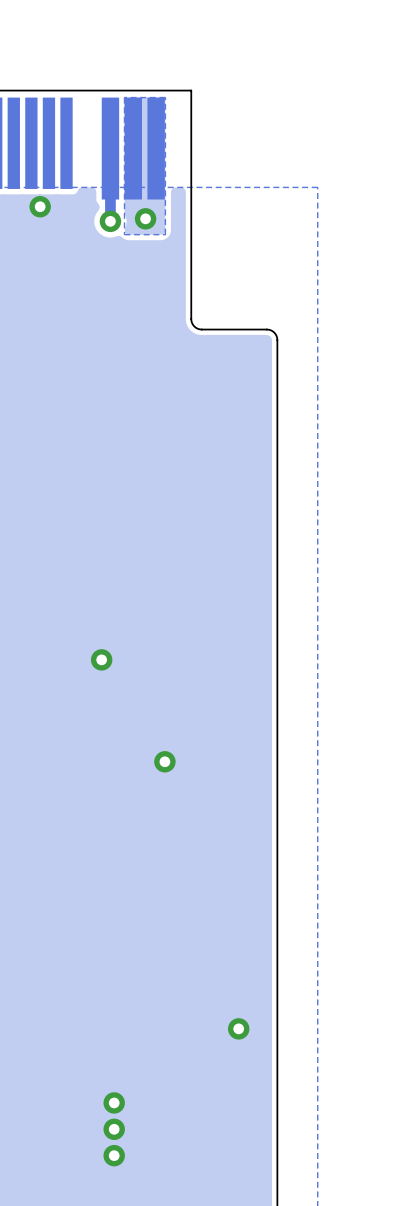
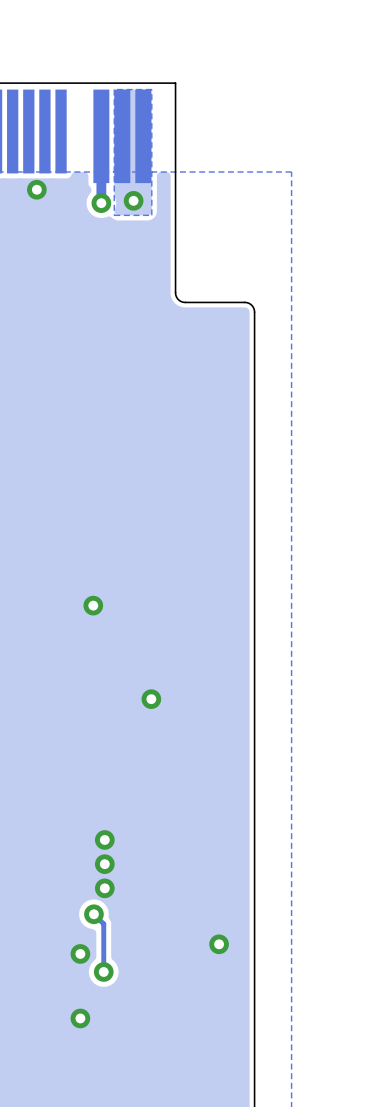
via: none -> (104, 839)
via: none -> (104, 864)
via: none -> (104, 888)
track: none -> (93, 914) (103, 924) (103, 971)
via: none -> (93, 914)
via: none -> (80, 953)
via: none -> (103, 971)
via: (114, 1102) -> none
via: none -> (80, 1018)
via: (114, 1129) -> none
via: (114, 1155) -> none

